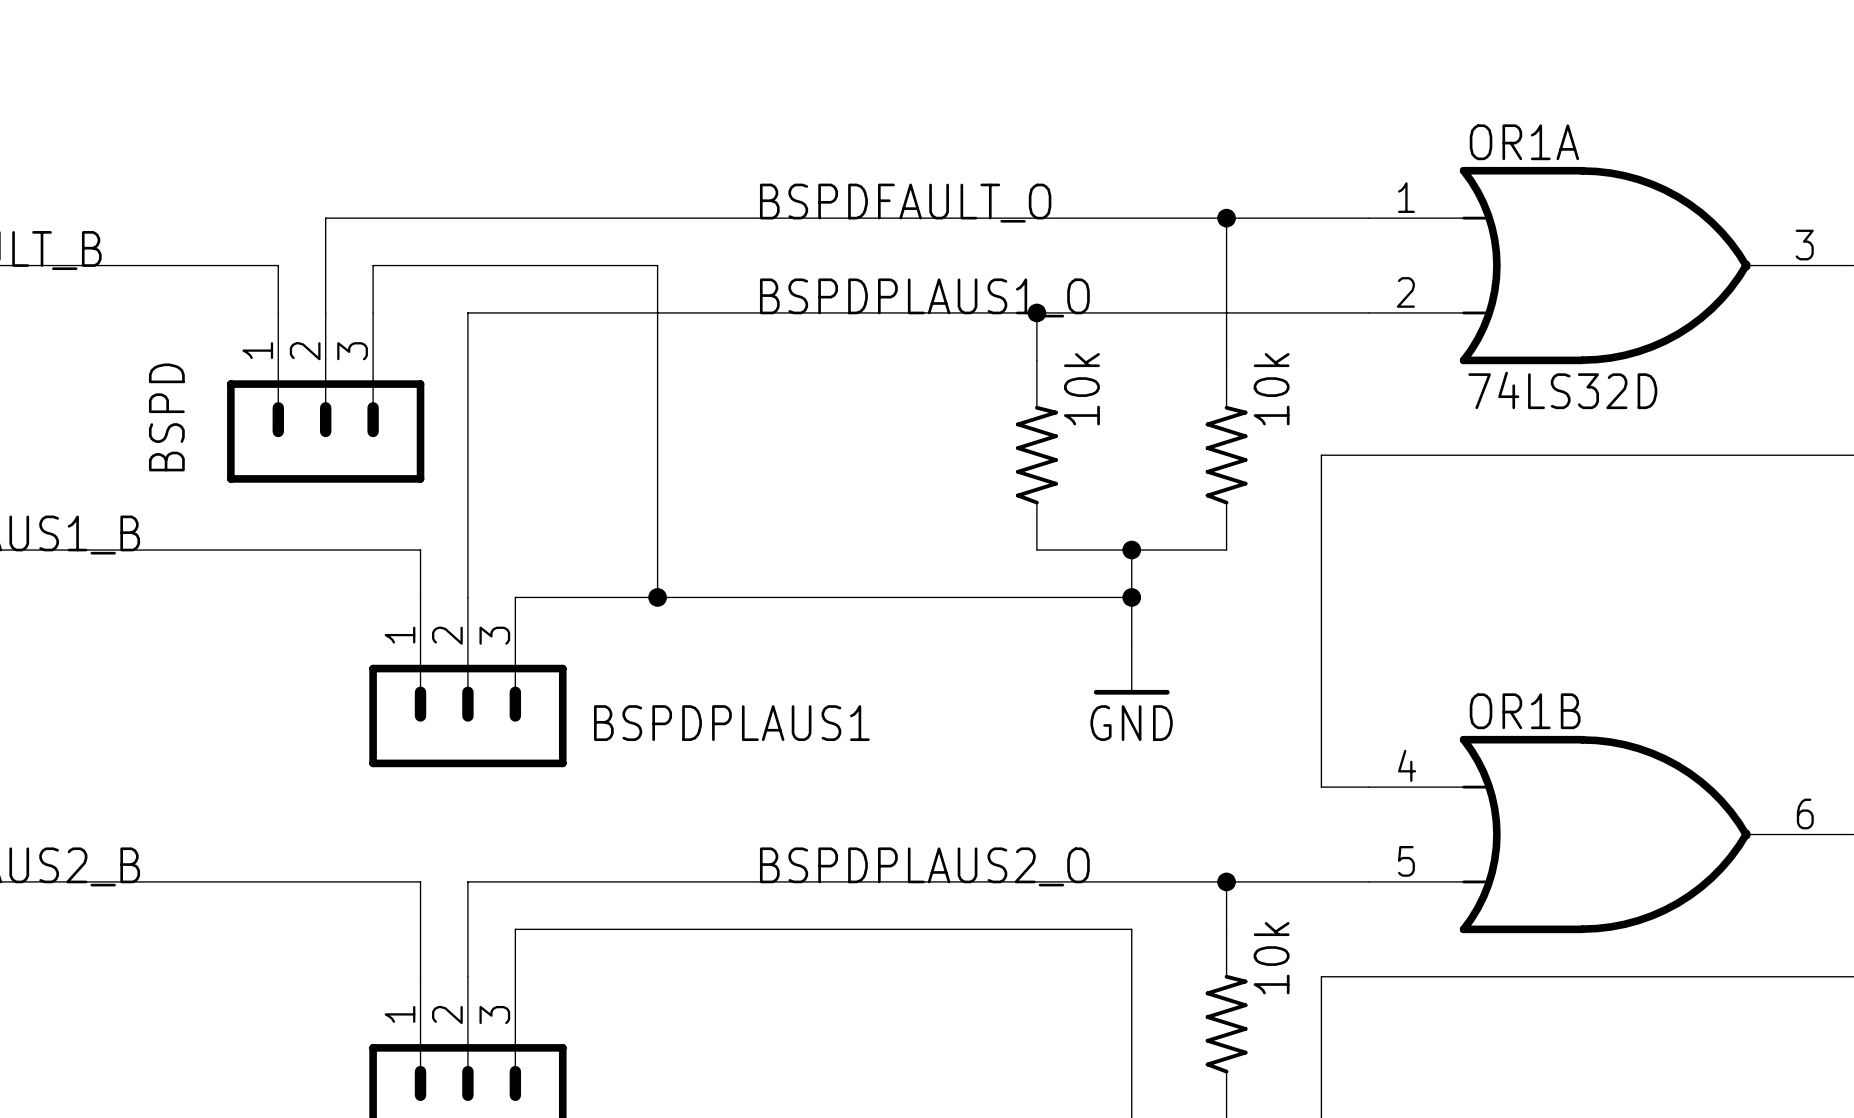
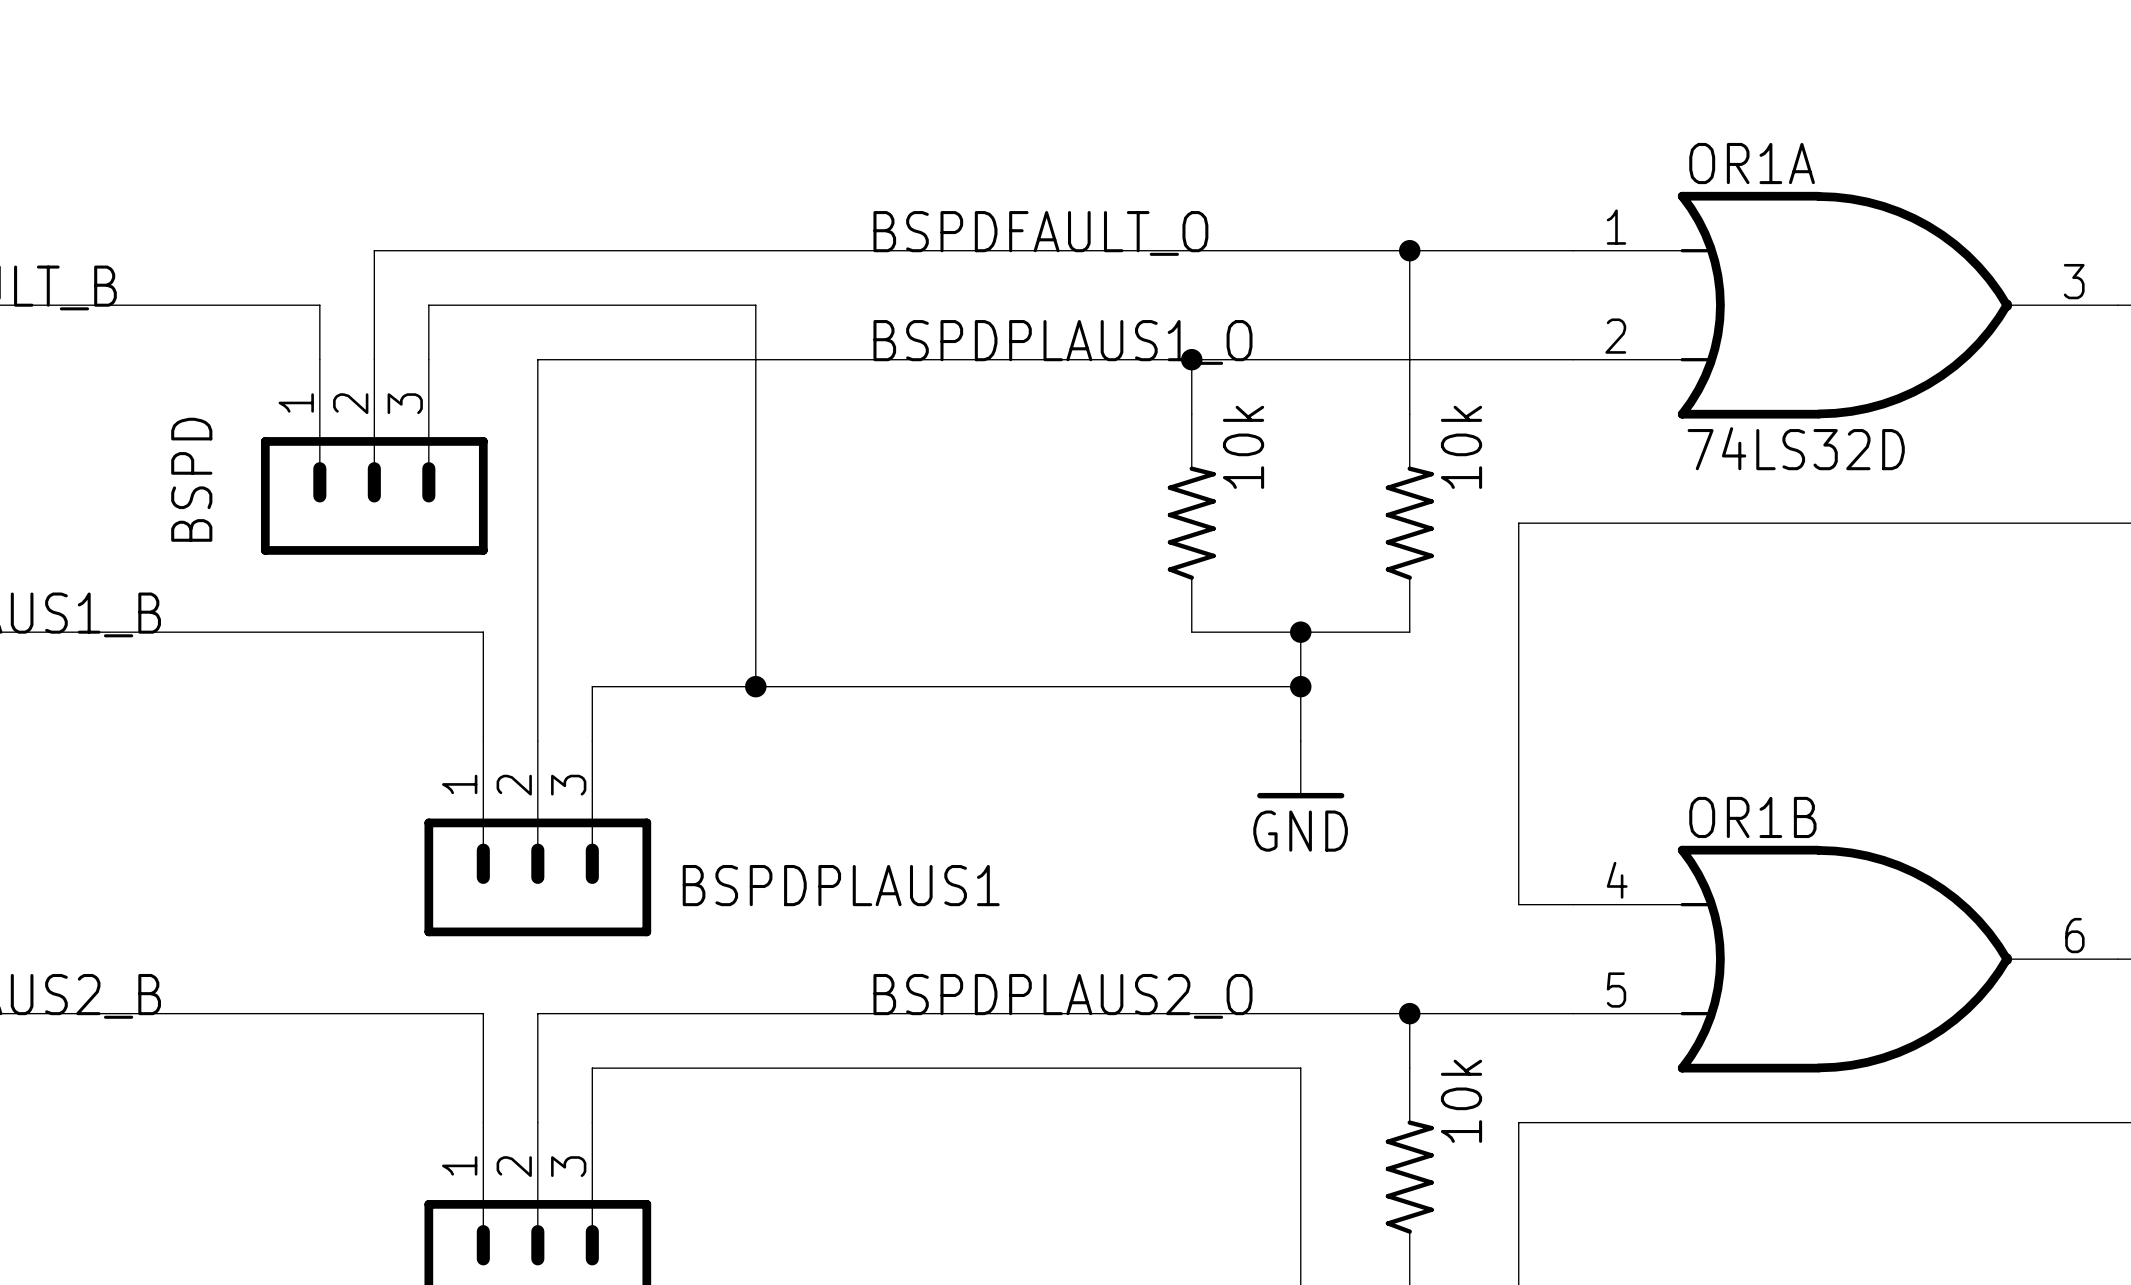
BSPDPLAUS1 position: (467, 682) -> (537, 838)

